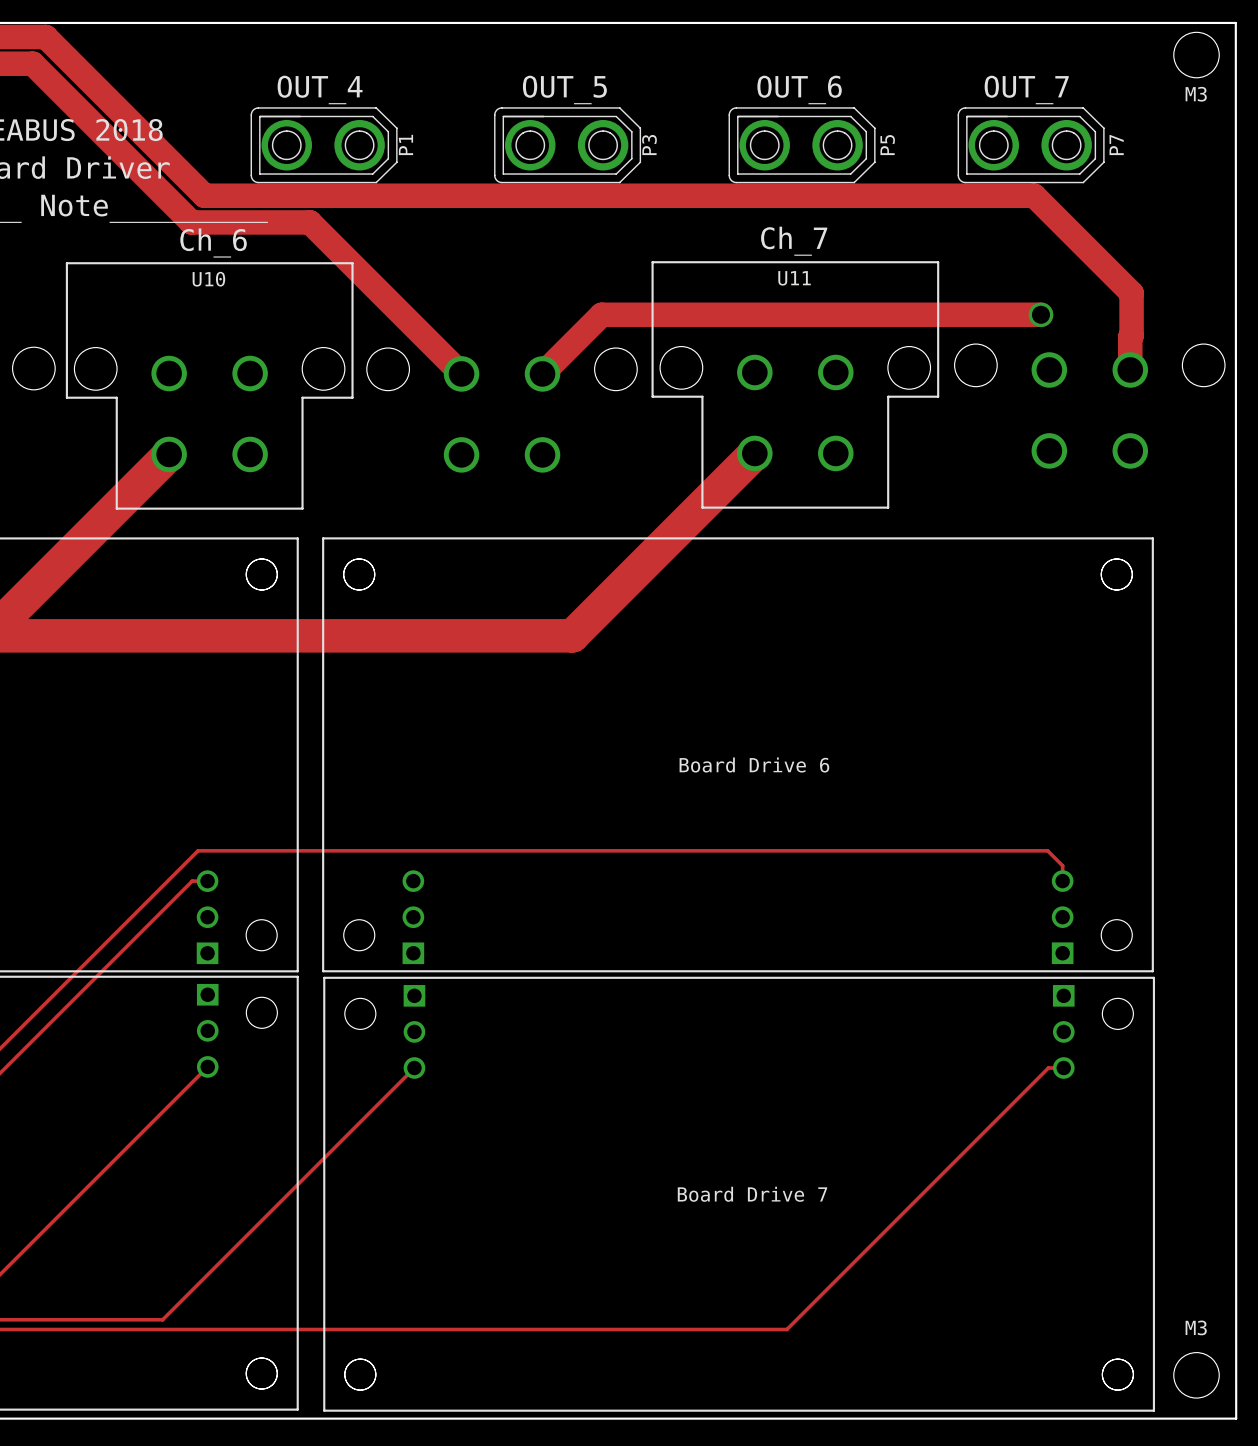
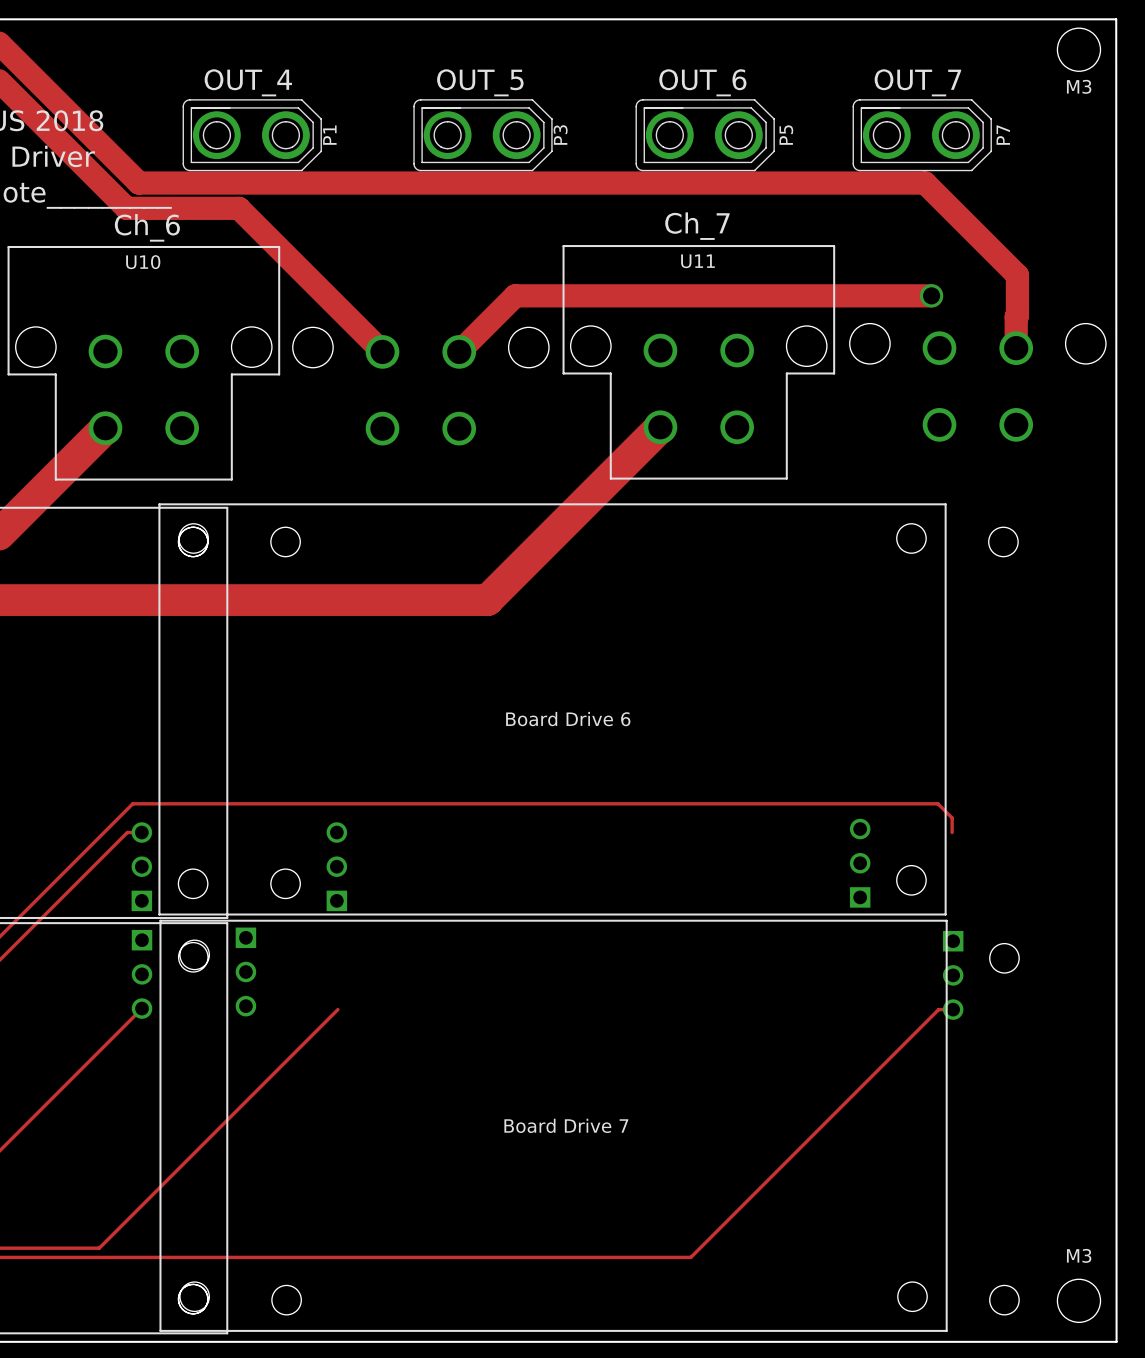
Board Drive 6 position: (738, 754) -> (552, 709)
Board Drive 7 position: (739, 1194) -> (553, 1125)

